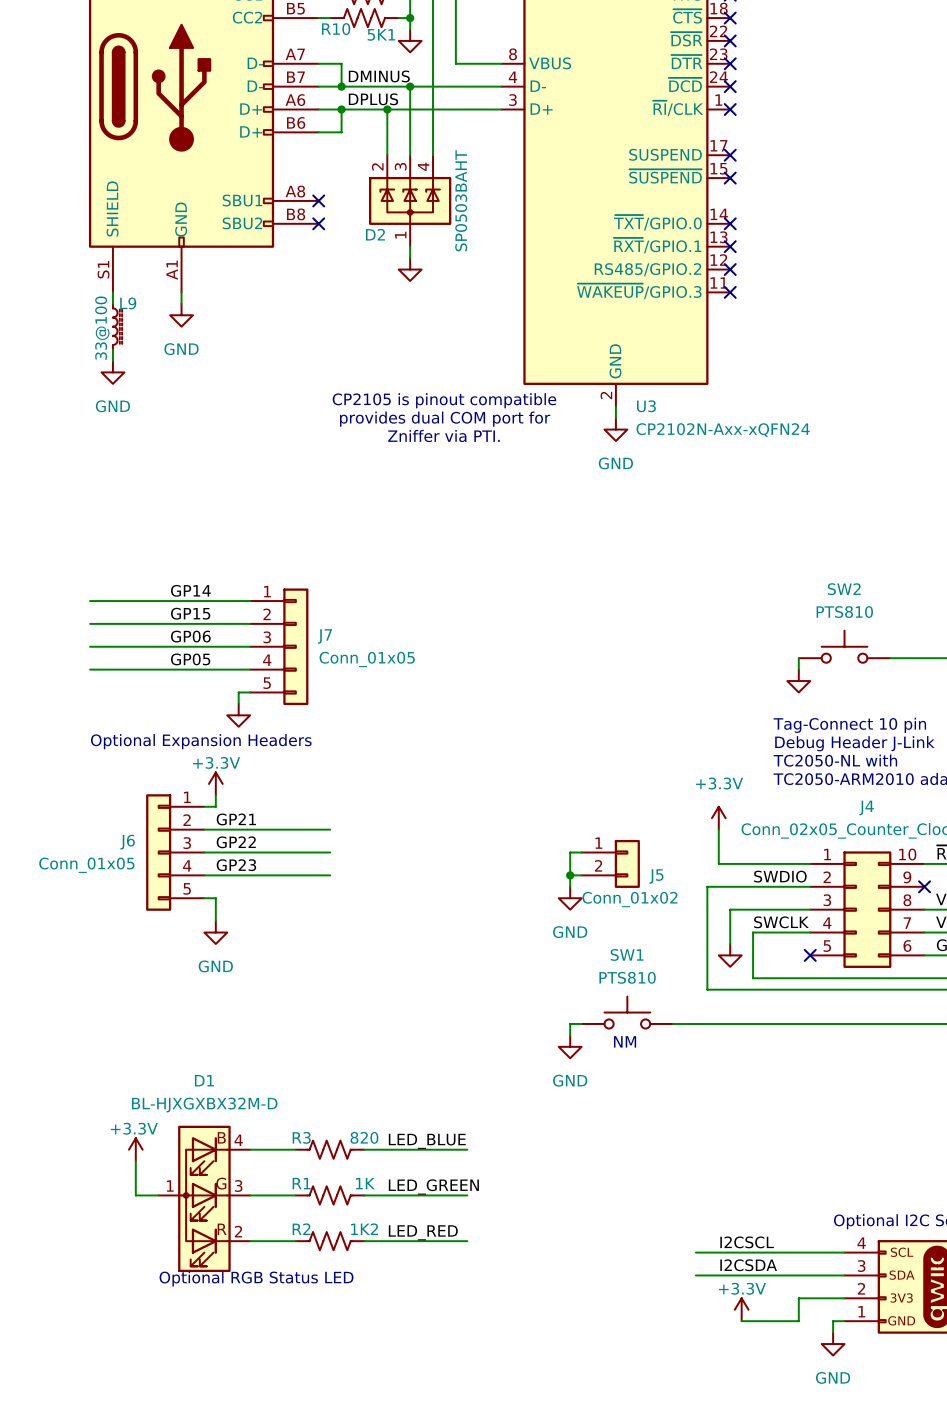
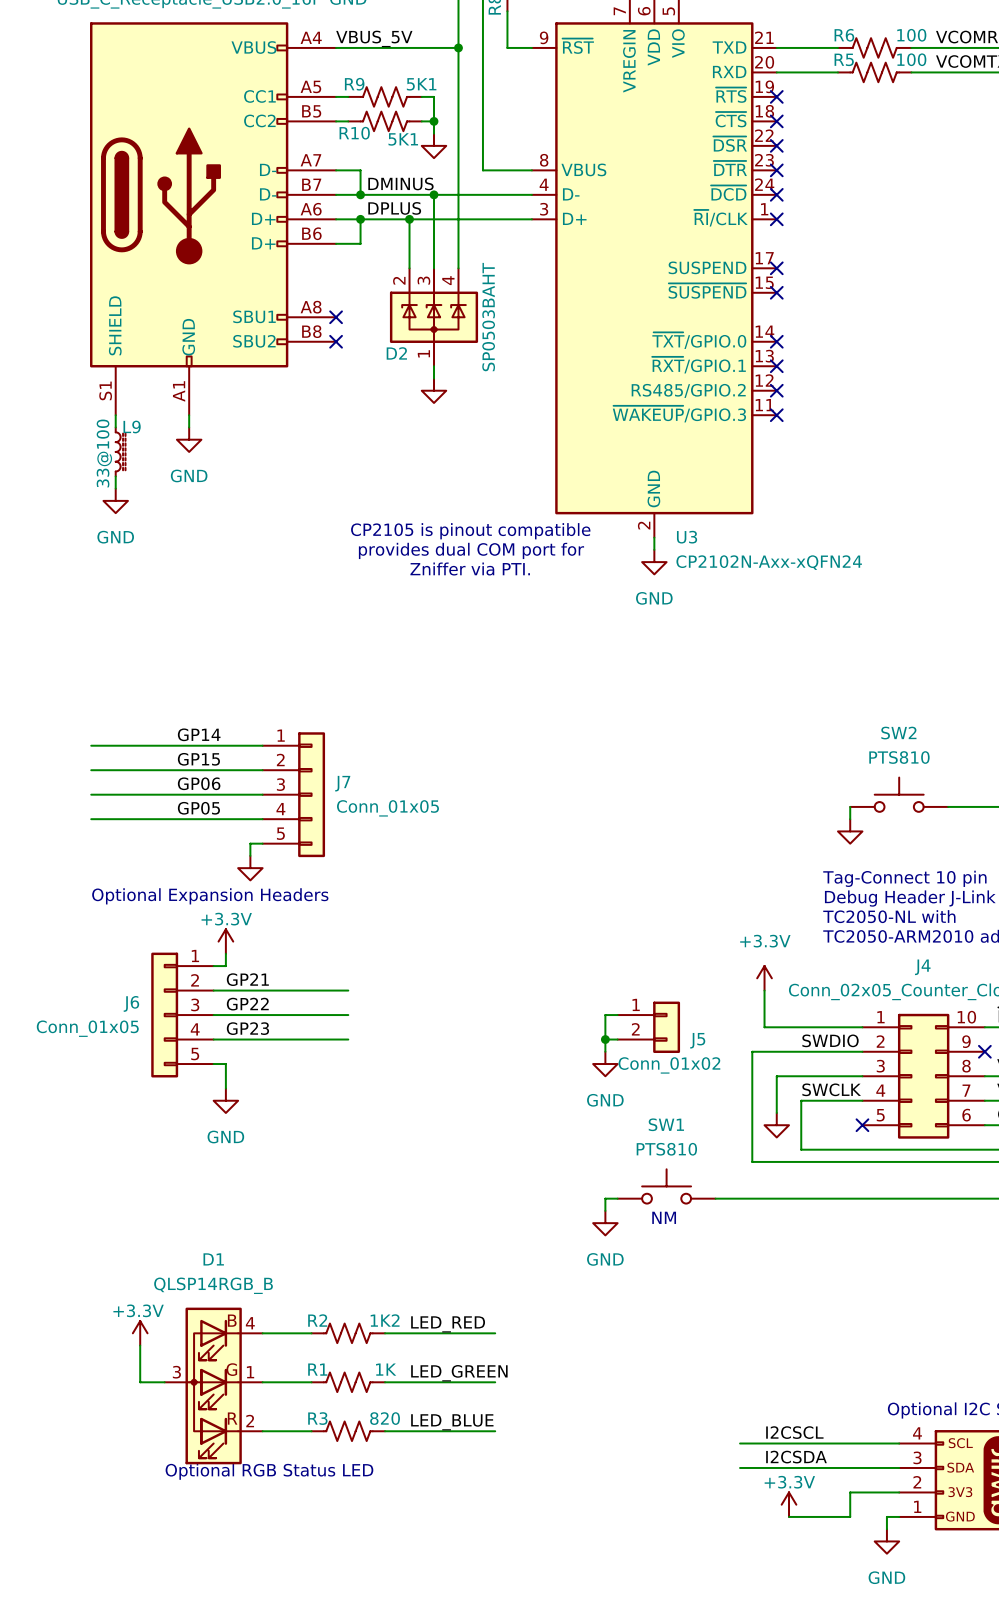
D1 value: BL-HJXGXBX32M-D (204, 1105) -> QLSP14RGB_B (213, 1285)
R3 name: R3 (301, 1137) -> R2 (317, 1320)
R3 value: 820 (364, 1137) -> 1K2 (385, 1320)
label: LED_BLUE (427, 1141) -> LED_RED (448, 1324)
D1 pin number: 1 (170, 1186) -> 3 (176, 1372)
D1 pin number: 3 (238, 1186) -> 1 (250, 1372)
R2 name: R2 (301, 1229) -> R3 (317, 1418)
R2 value: 1K2 (364, 1229) -> 820 (385, 1418)
label: LED_RED (423, 1232) -> LED_BLUE (452, 1422)

